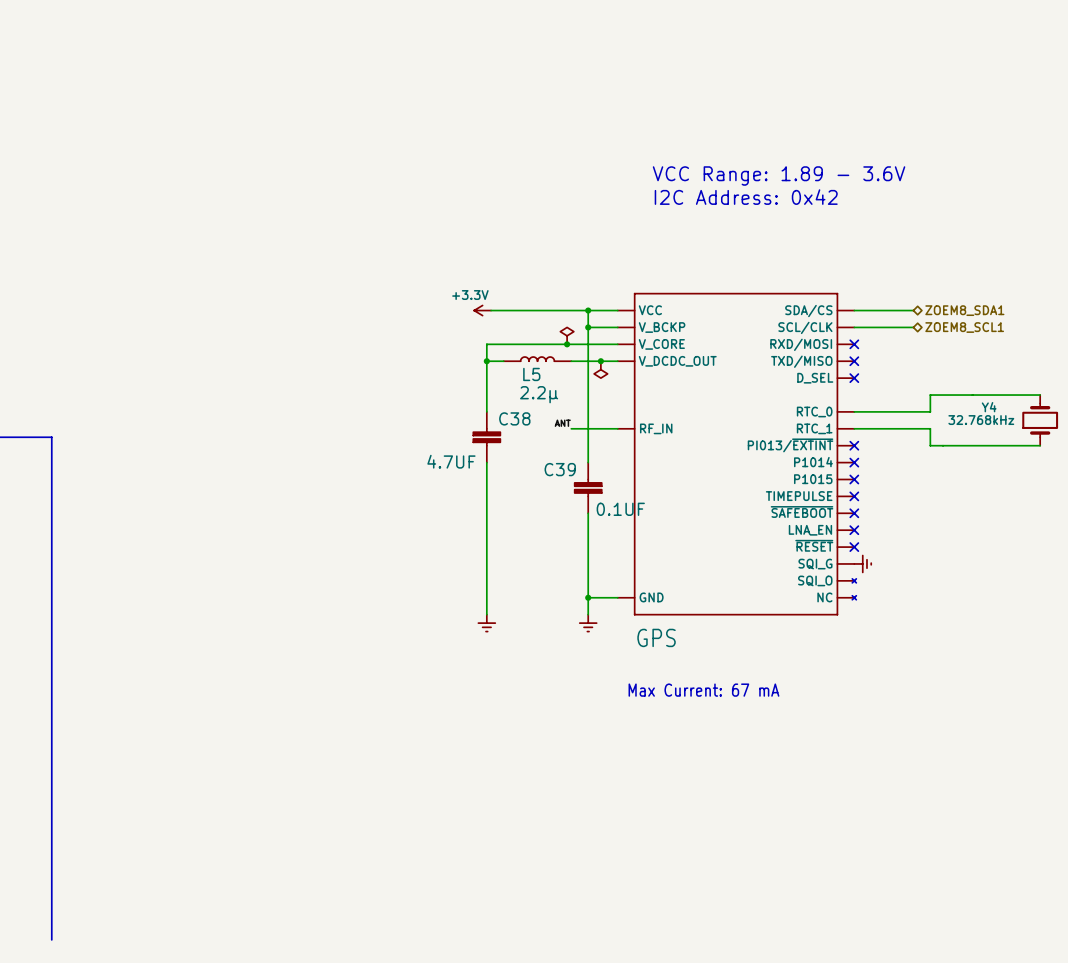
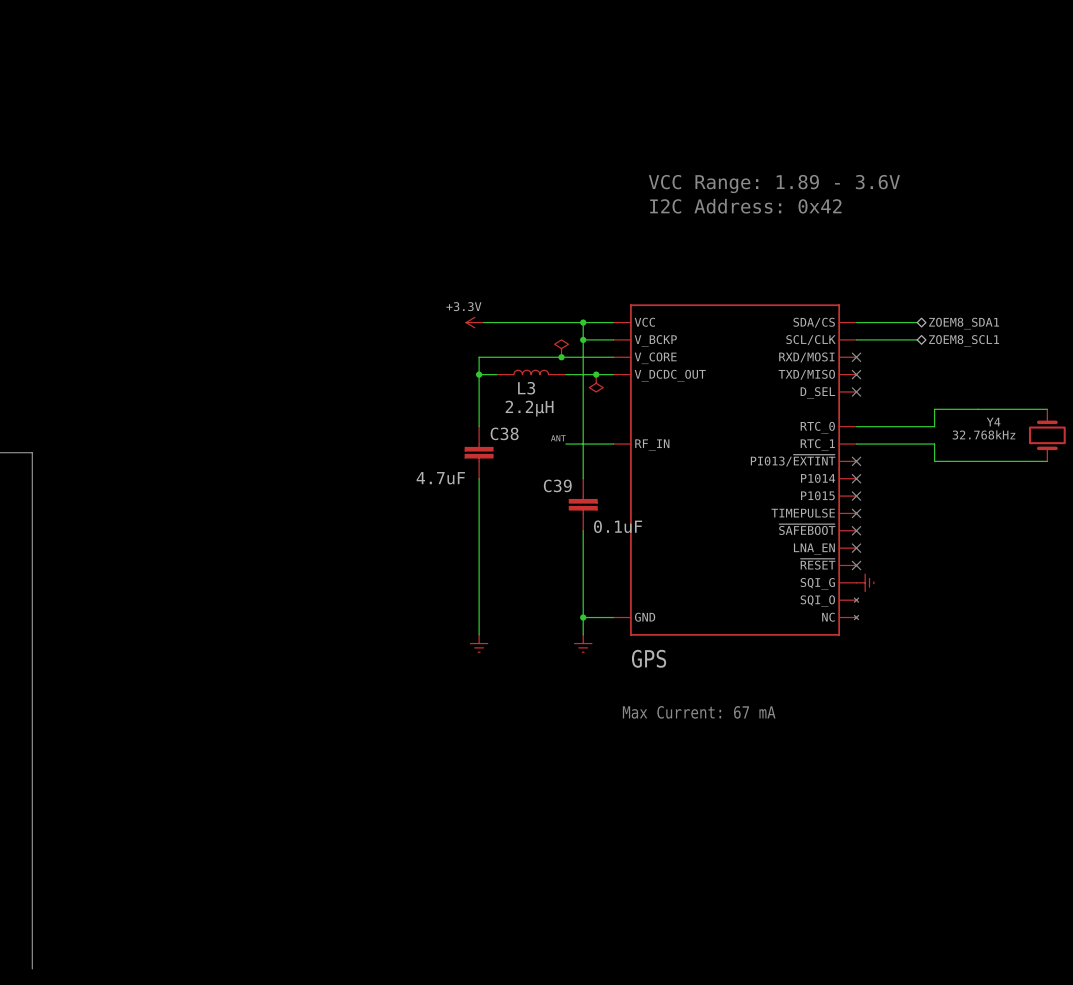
L5 name: L5 (531, 374) -> L3 (526, 388)
L5 value: 2.2μ (539, 394) -> 2.2μH (529, 408)
C38 value: 4.7UF (451, 461) -> 4.7uF (440, 478)
C39 value: 0.1UF (620, 509) -> 0.1uF (618, 526)

